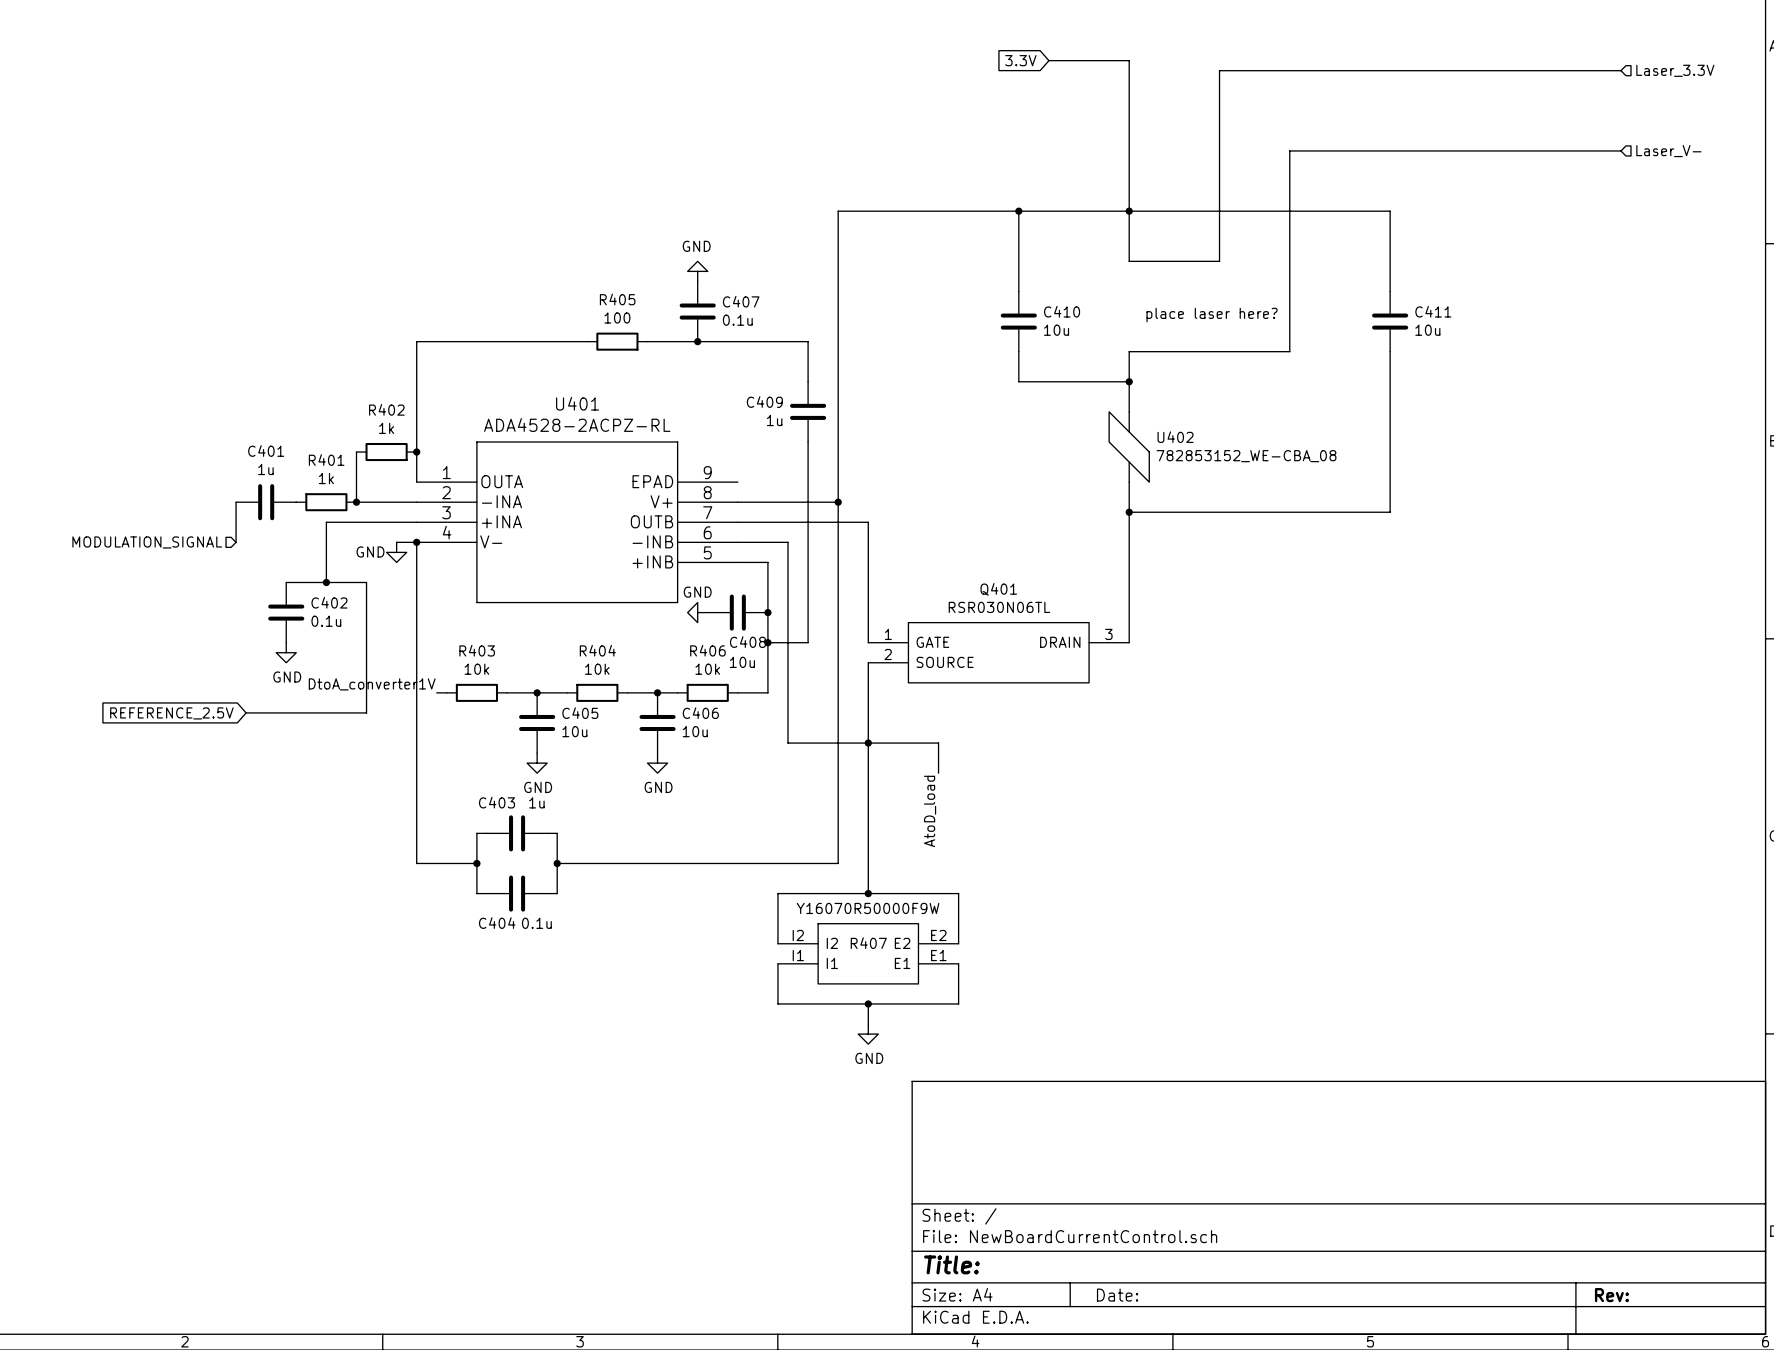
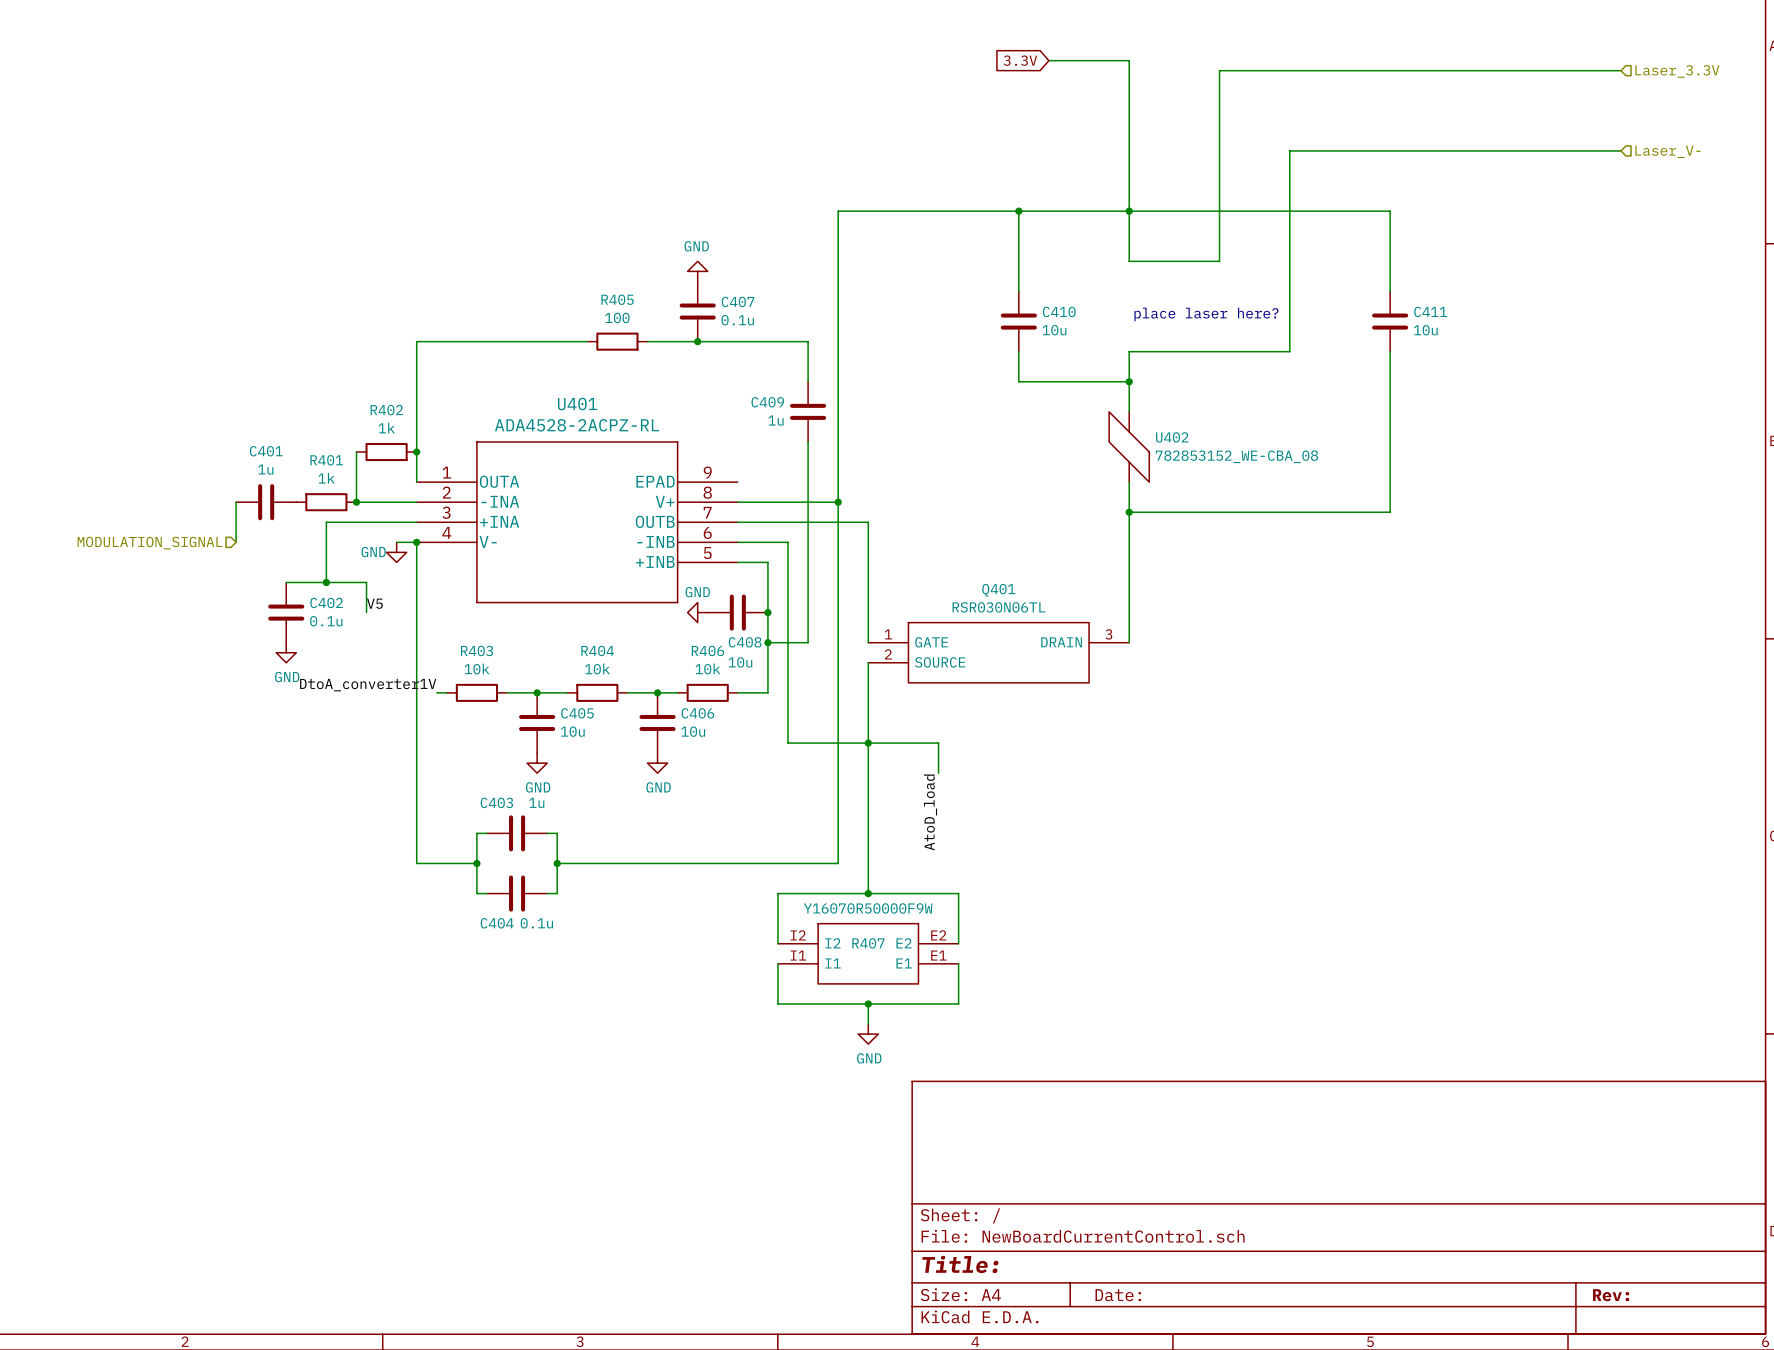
label: none -> V5 (374, 603)
wire: (366, 612) (366, 712) (246, 712) -> none
global label: REFERENCE_2.5V (171, 713) -> none

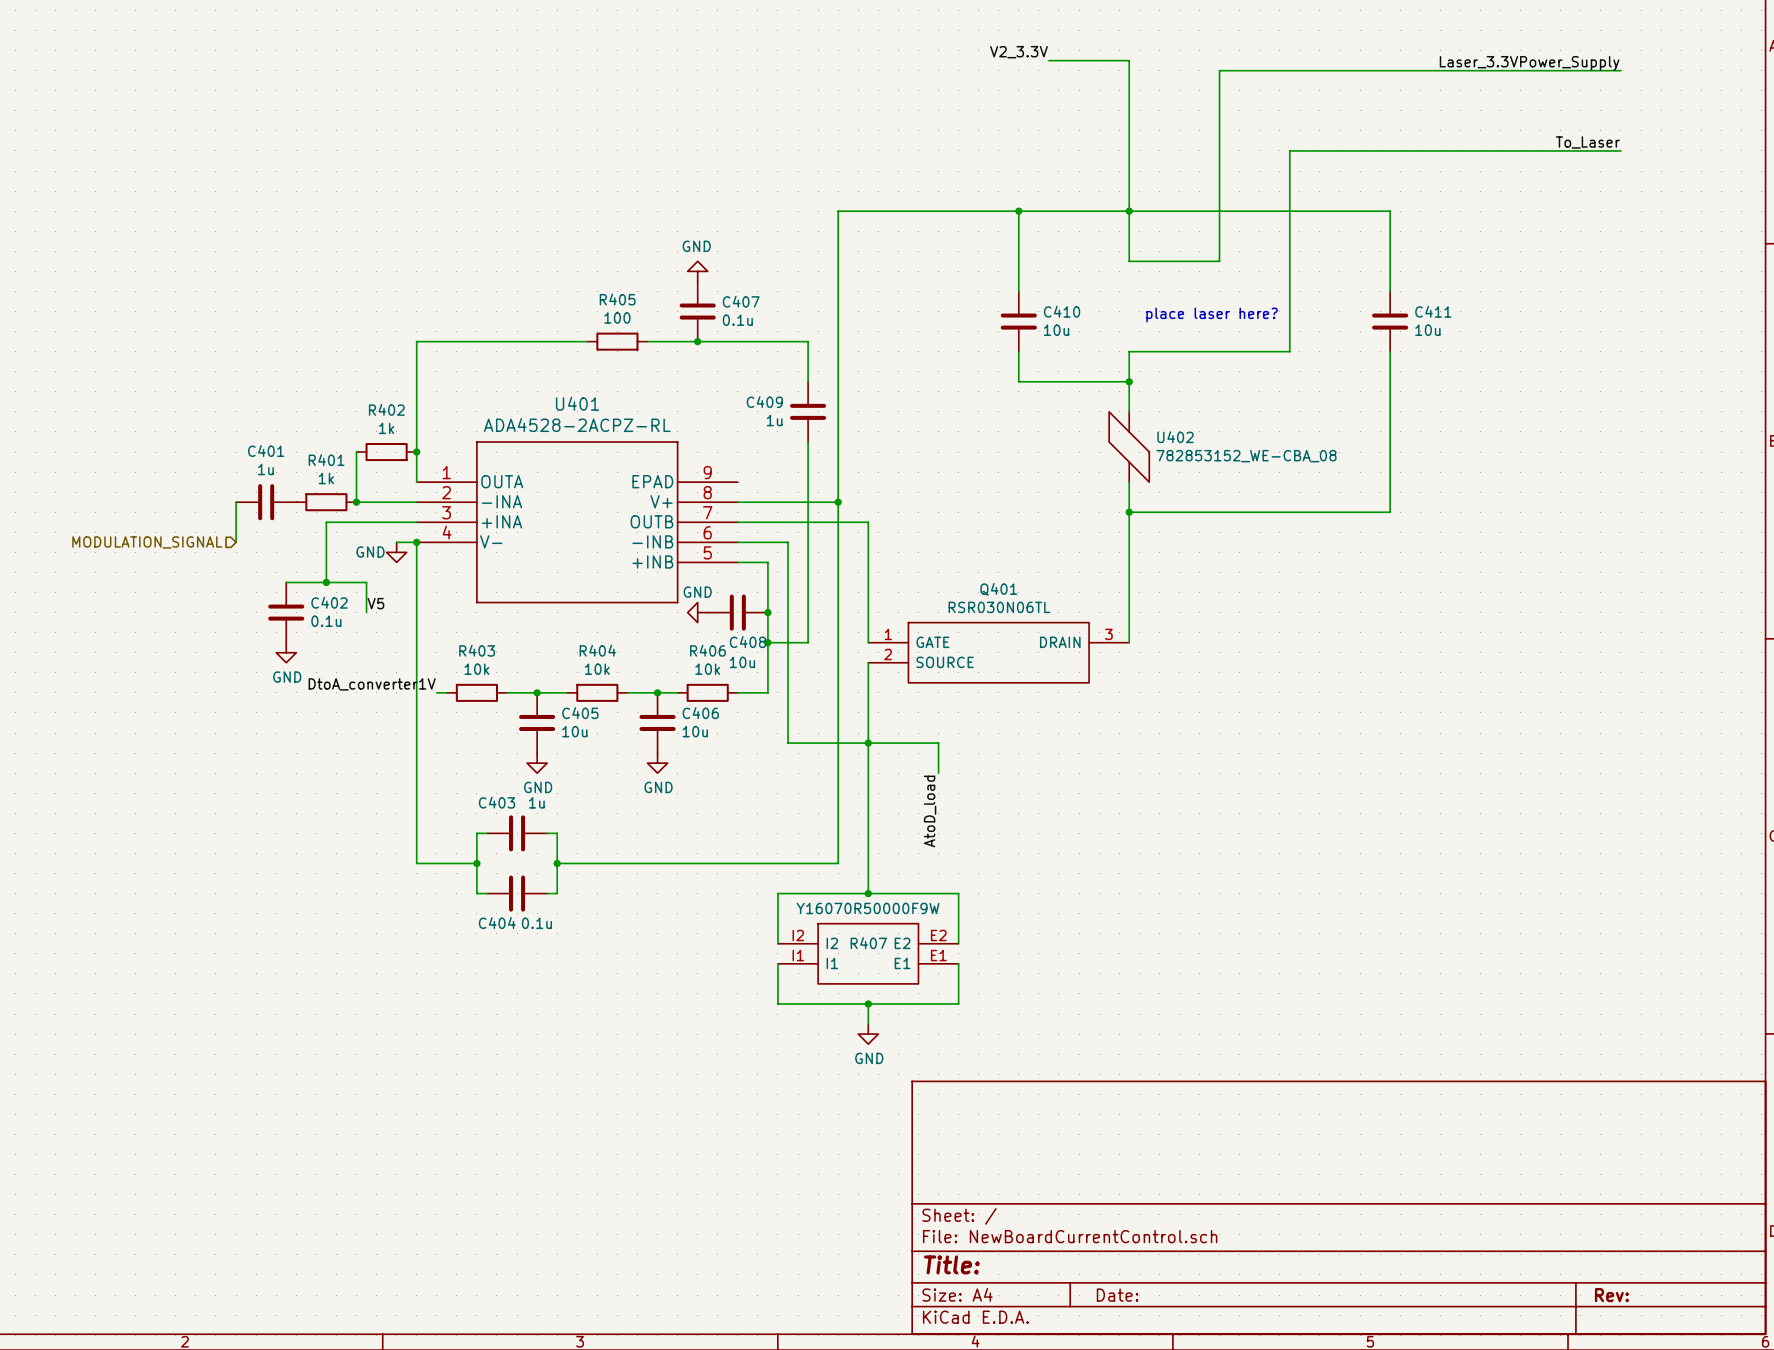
label: none -> V2_3.3V (1018, 52)
global label: 3.3V (1020, 60) -> none
label: none -> Laser_3.3VPower_Supply (1529, 63)
hierarchical label: Laser_3.3V (1677, 71) -> none
label: none -> To_Laser (1587, 142)
hierarchical label: Laser_V- (1667, 151) -> none

